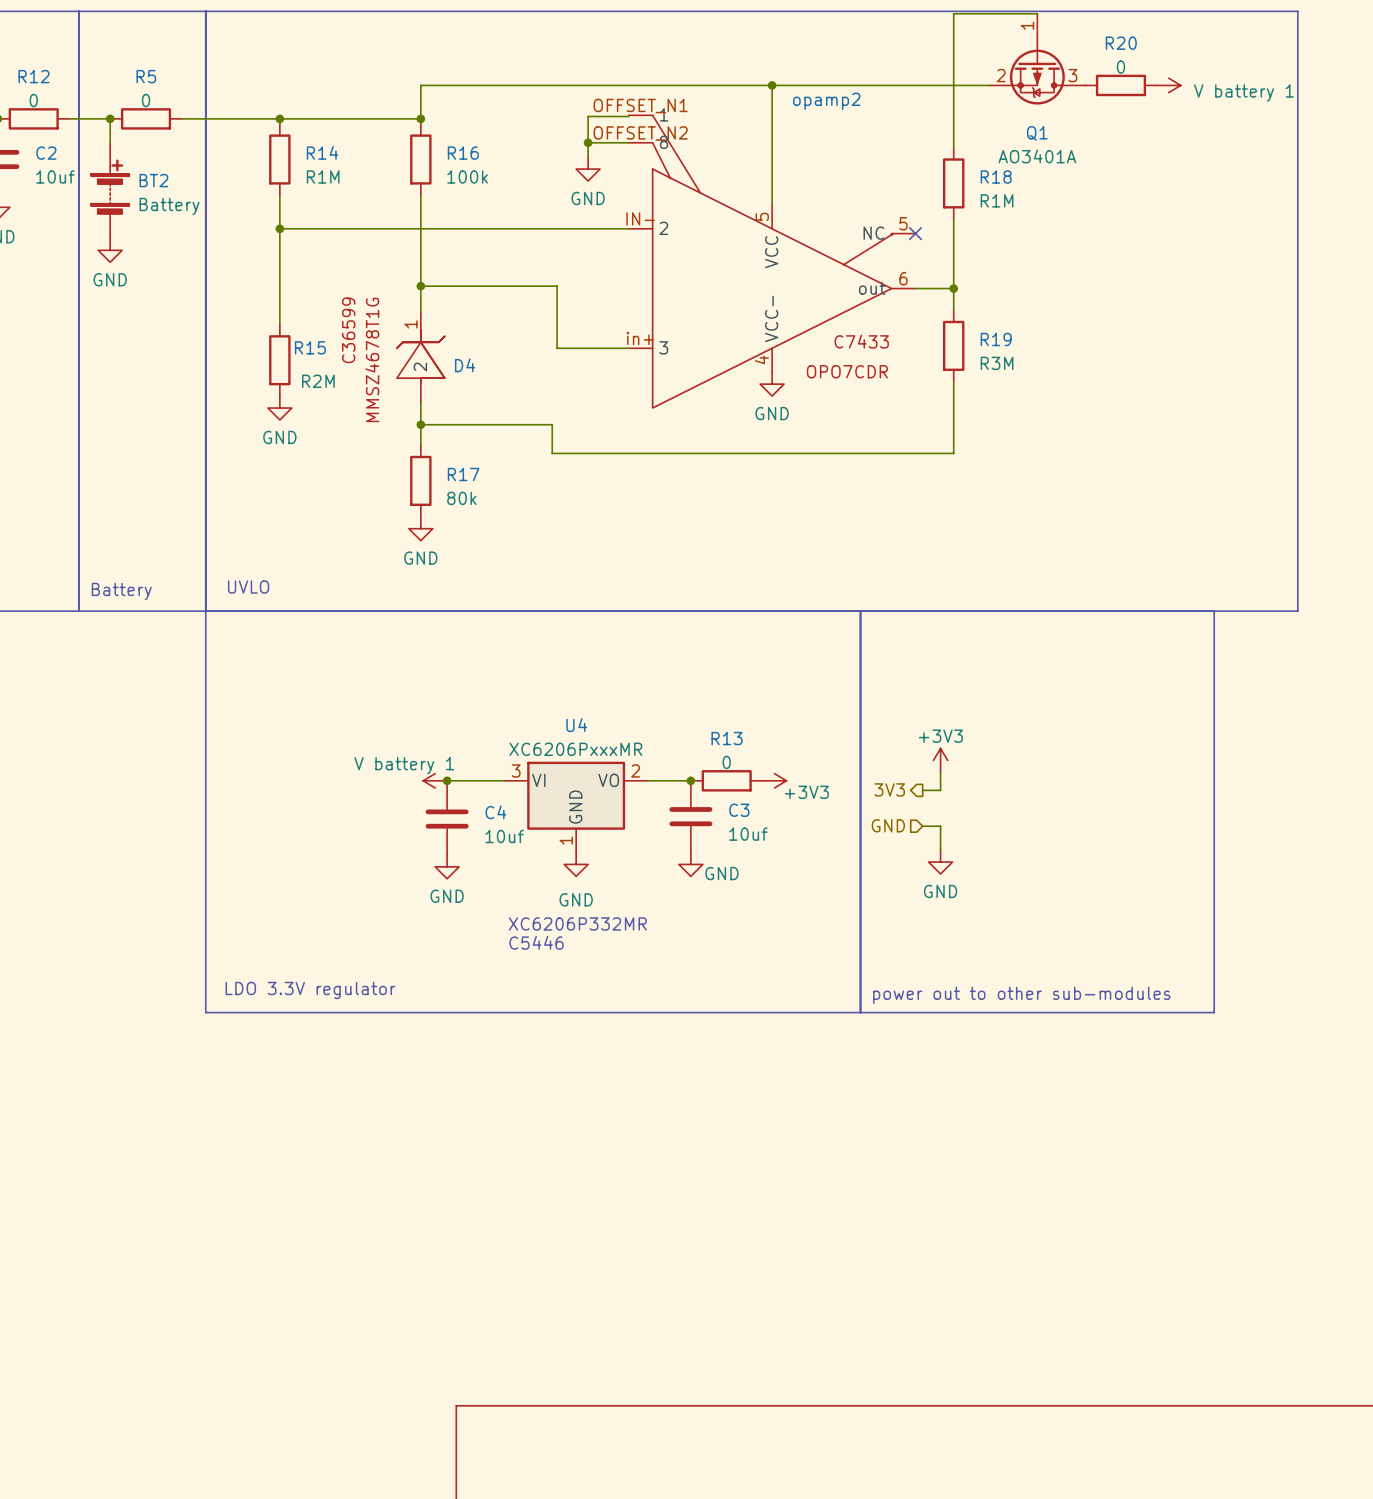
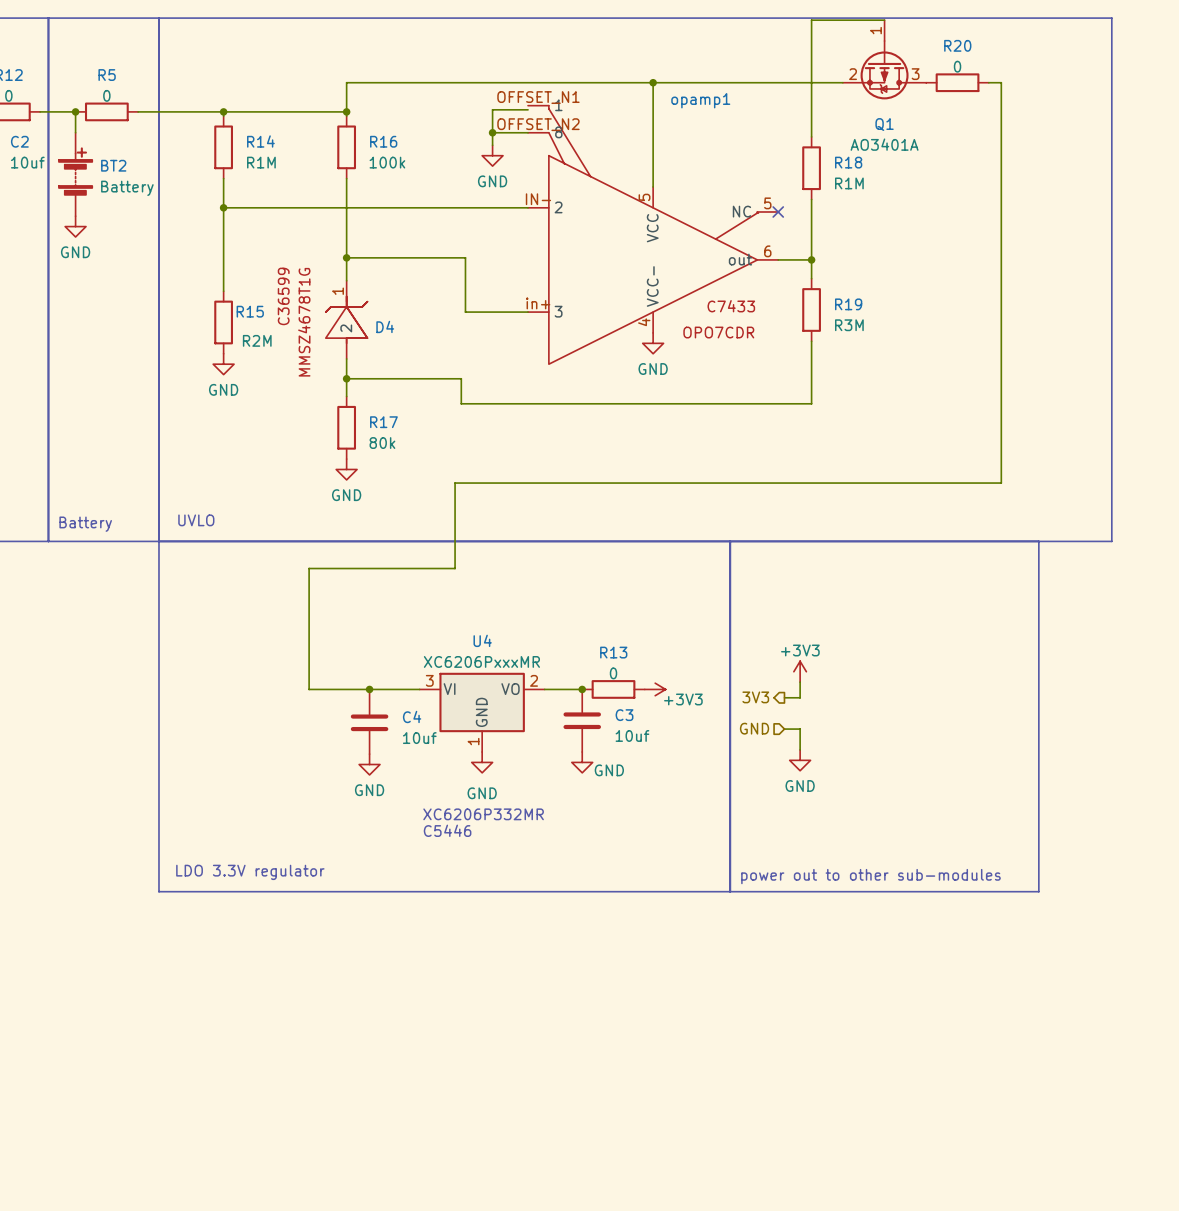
wire: none -> (988, 82) (1001, 82) (1001, 483) (455, 483) (455, 568) (309, 568) (309, 689) (369, 689)
power symbol: V battery 1 (1168, 85) -> none
opamp1: none -> (653, 234)
opamp2: (772, 261) -> none
power symbol: V battery 1 (435, 780) -> none

